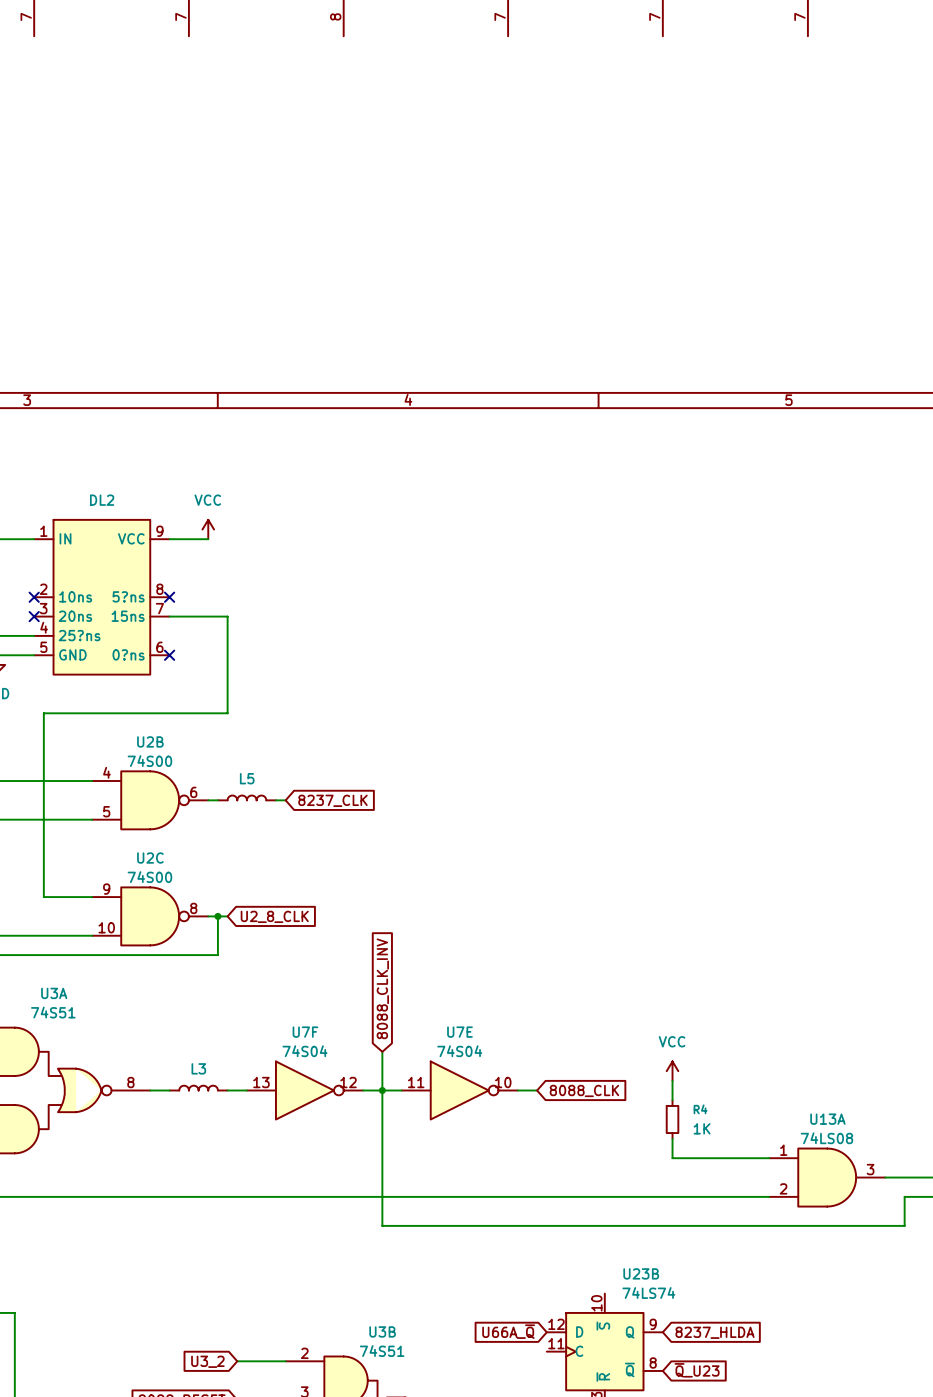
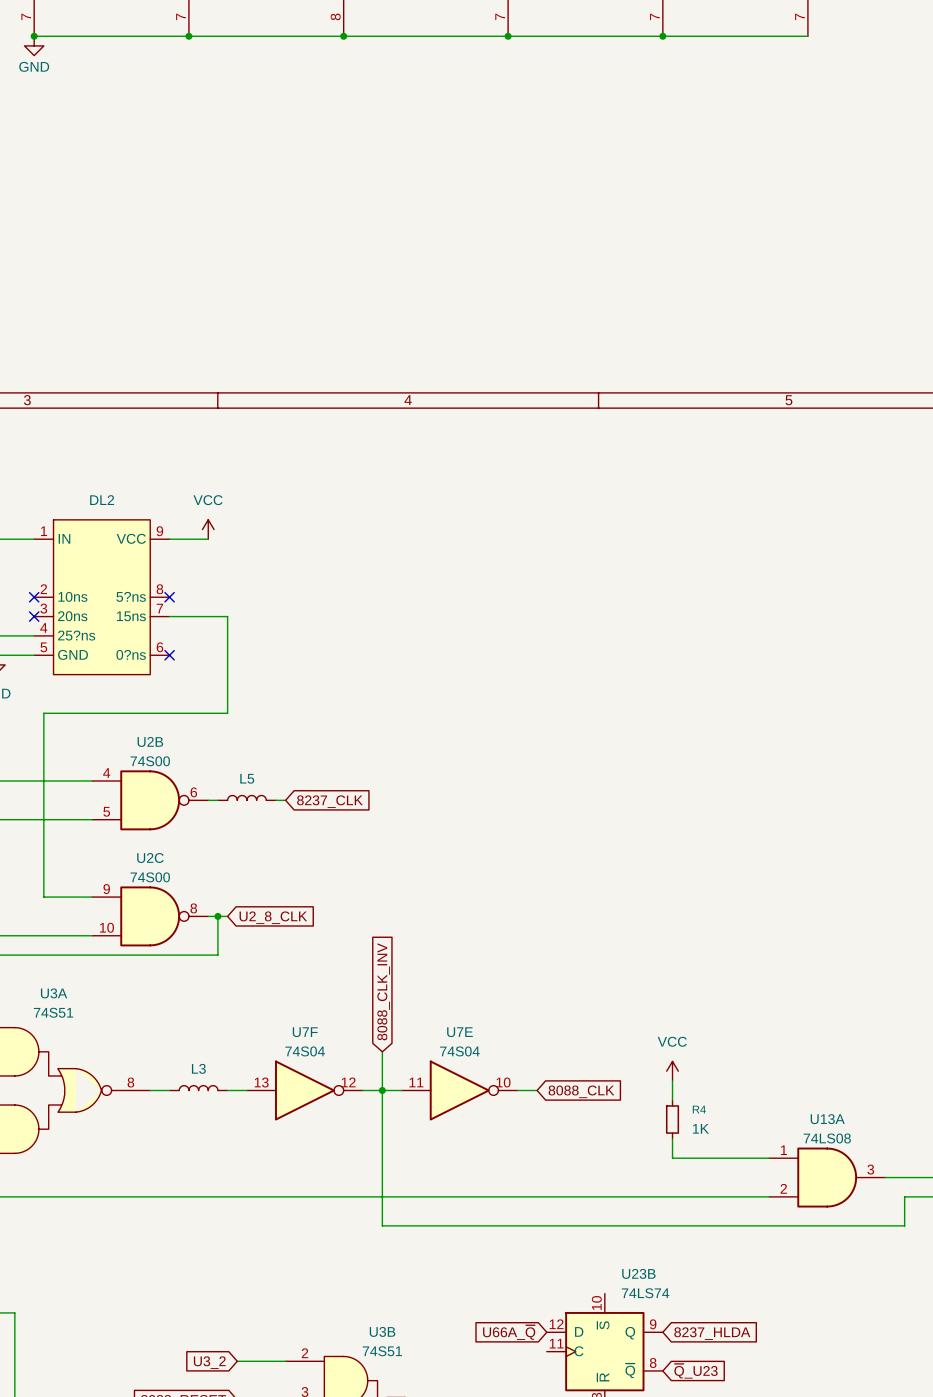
wire: none -> (34, 36) (807, 36)
junction: none -> (34, 36)
junction: none -> (188, 36)
junction: none -> (343, 36)
junction: none -> (508, 36)
junction: none -> (662, 36)
power symbol: none -> GND (34, 45)

